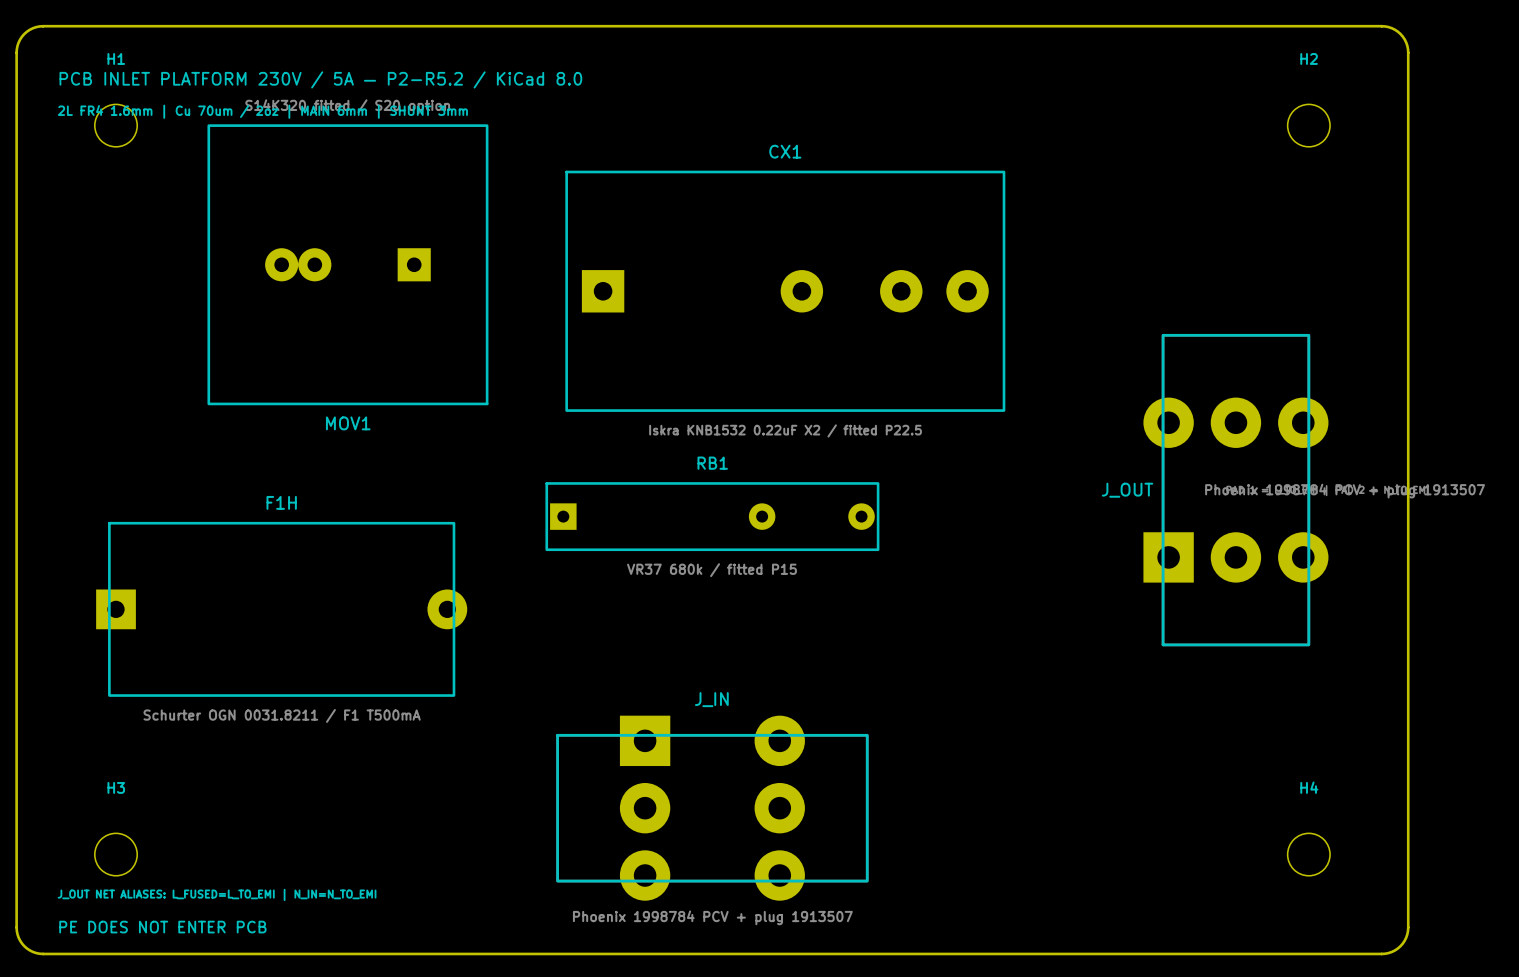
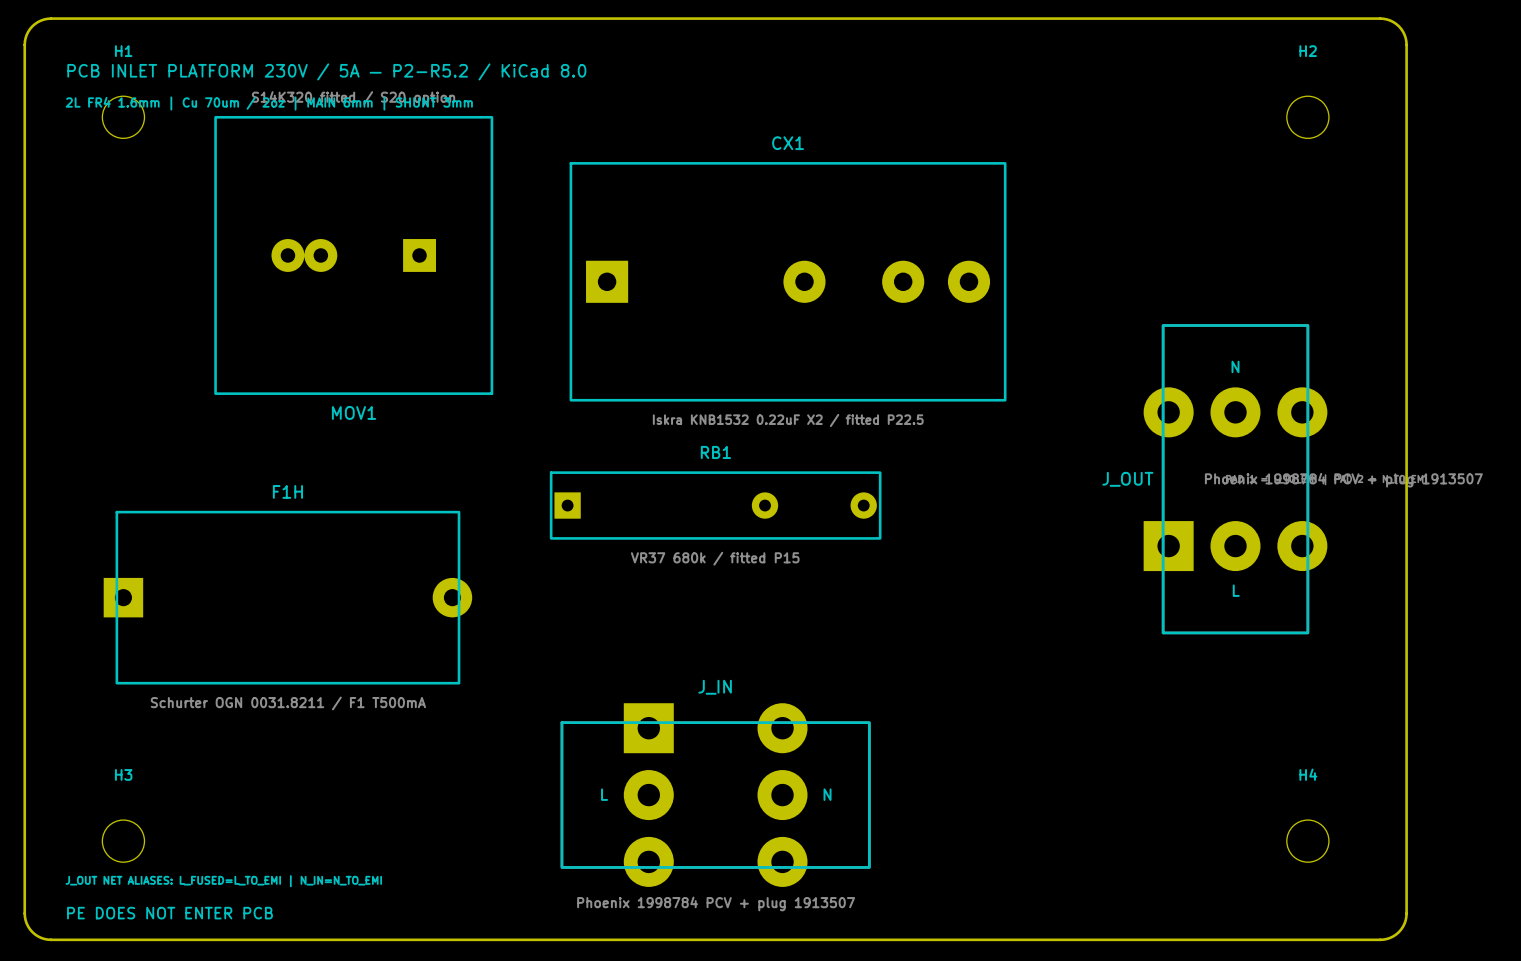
J_OUT text: none -> N (1235, 366)
J_OUT text: none -> L (1236, 590)
J_IN text: none -> L (604, 794)
J_IN text: none -> N (827, 794)

